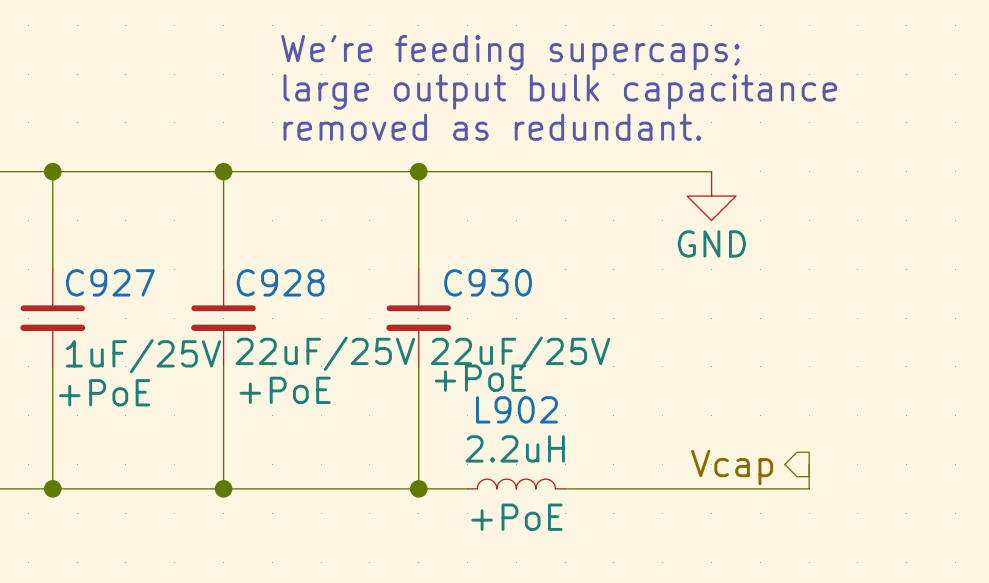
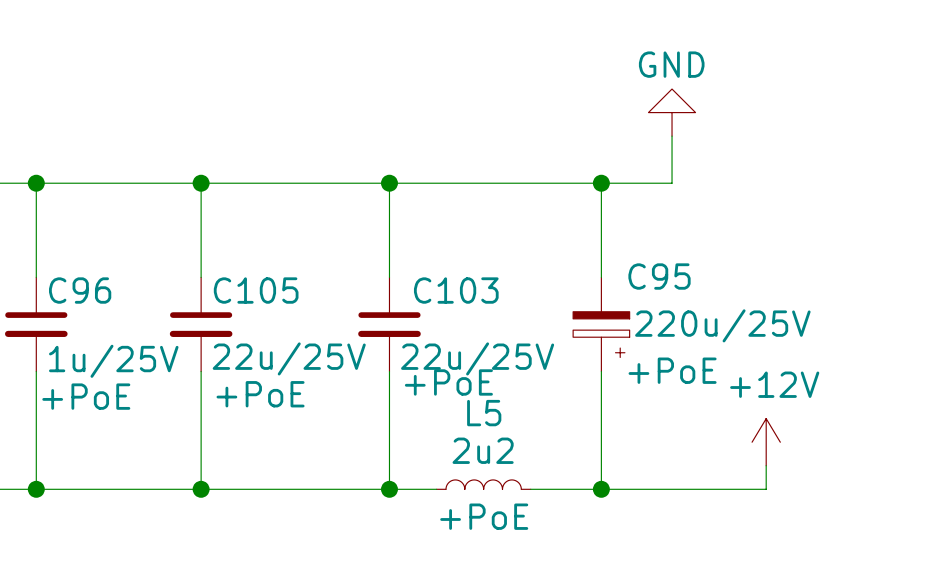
text: We're feeding supercaps; (510, 52) -> none
text: large output bulk capacitance (560, 91) -> none
wire: none -> (672, 136) (672, 183)
text: removed as redundant. (492, 127) -> none
wire: none -> (601, 183) (601, 277)
junction: none -> (601, 183)
power symbol rotation: 0° (711, 196) -> 180° (672, 112)
power symbol position: GND (711, 196) -> GND (672, 112)
C927 name: C927 (110, 282) -> C96 (80, 290)
C928 name: C928 (280, 282) -> C105 (256, 290)
C930 name: C930 (488, 282) -> C103 (456, 290)
C95: none -> 220u/25V (601, 324)
C928 value: 22uF/25V (325, 353) -> 22u/25V (289, 358)
C930 value: 22uF/25V (520, 353) -> 22u/25V (477, 358)
C927 value: 1uF/25V (143, 356) -> 1u/25V (113, 361)
wire: none -> (601, 371) (601, 489)
L902 name: L902 (516, 409) -> L5 (484, 413)
power symbol: none -> +12V (766, 442)
L902 value: 2.2uH (515, 448) -> 2u2 (483, 450)
hierarchical label: Vcap (732, 467) -> none
junction: none -> (601, 489)

